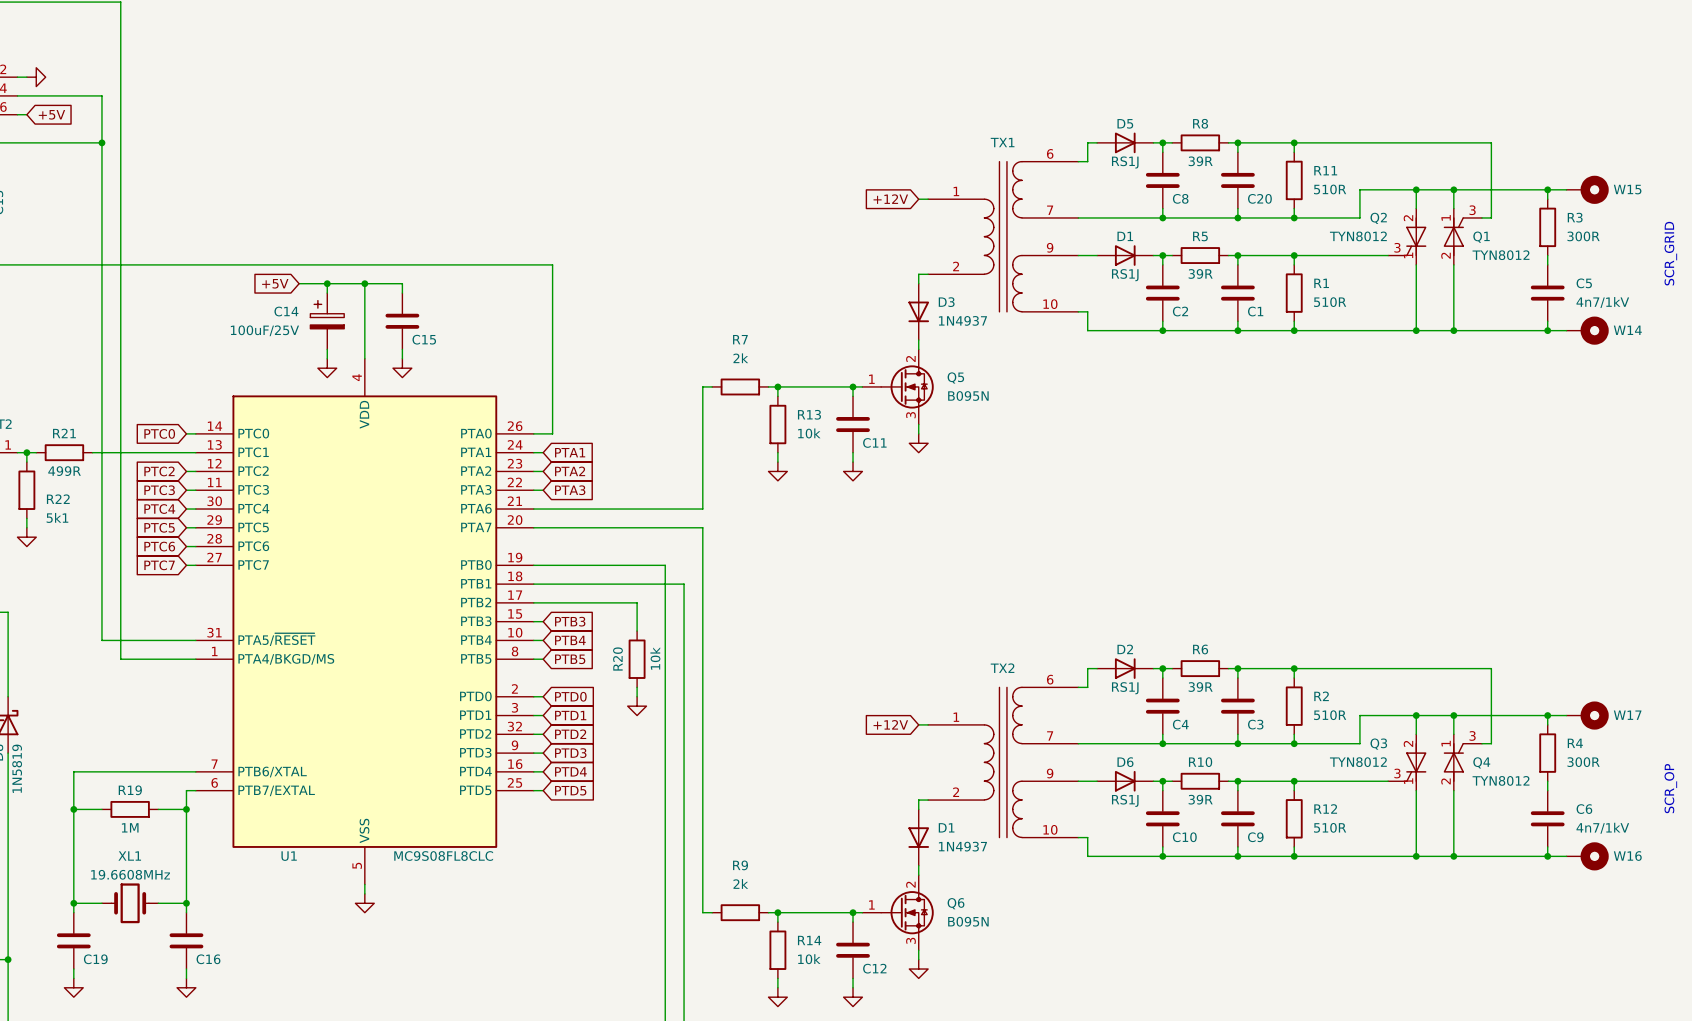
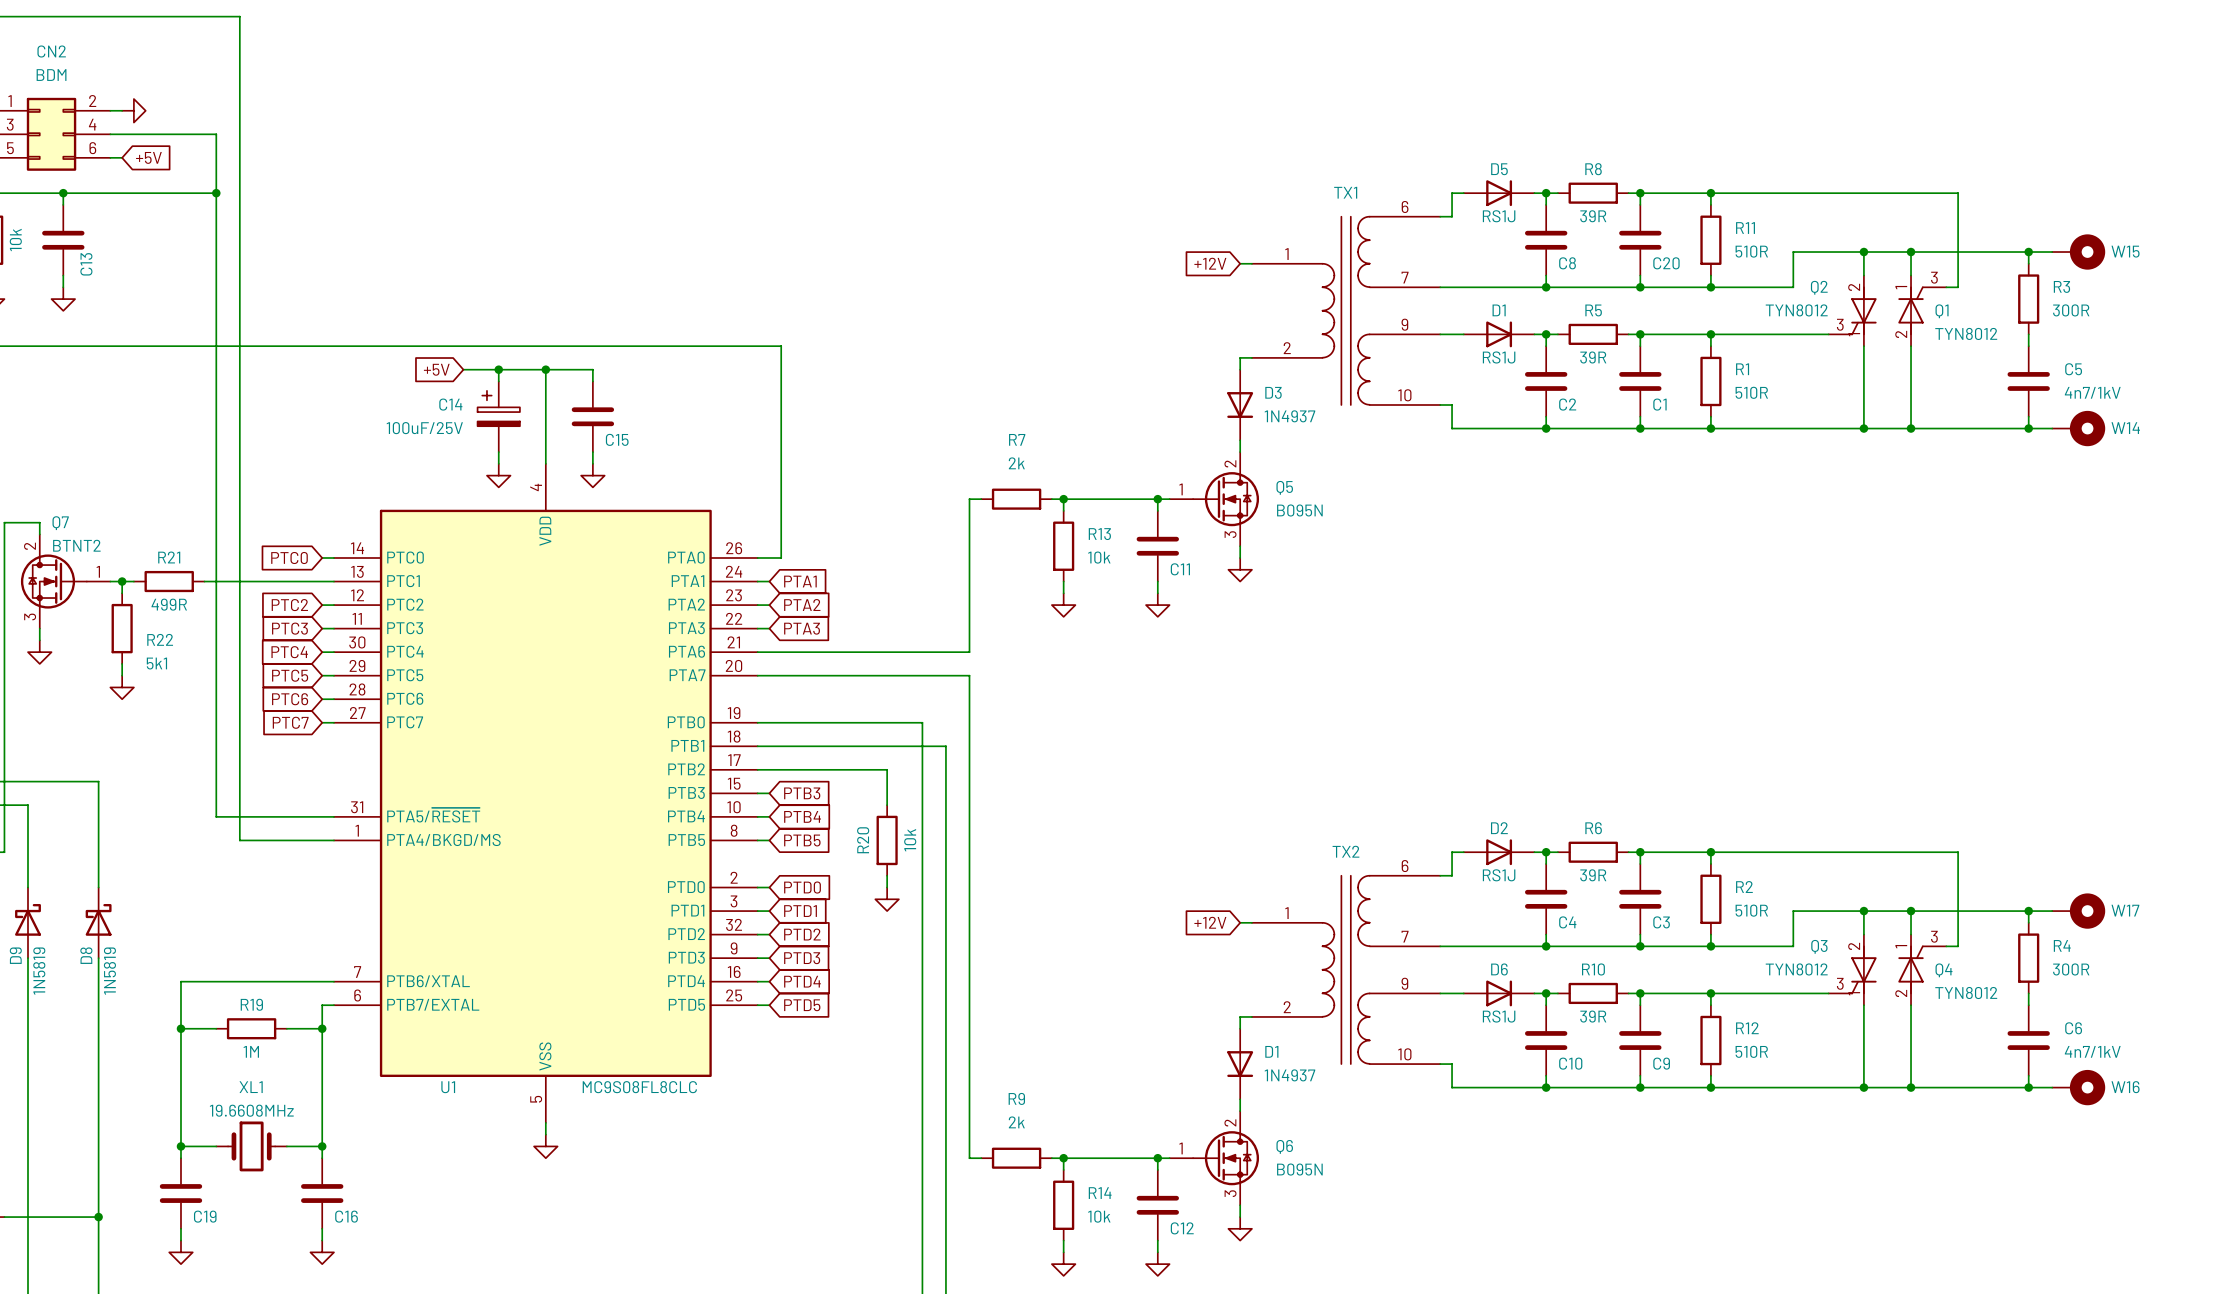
text: SCR_GRID (1670, 253) -> none
text: SCR_OP (1670, 788) -> none

